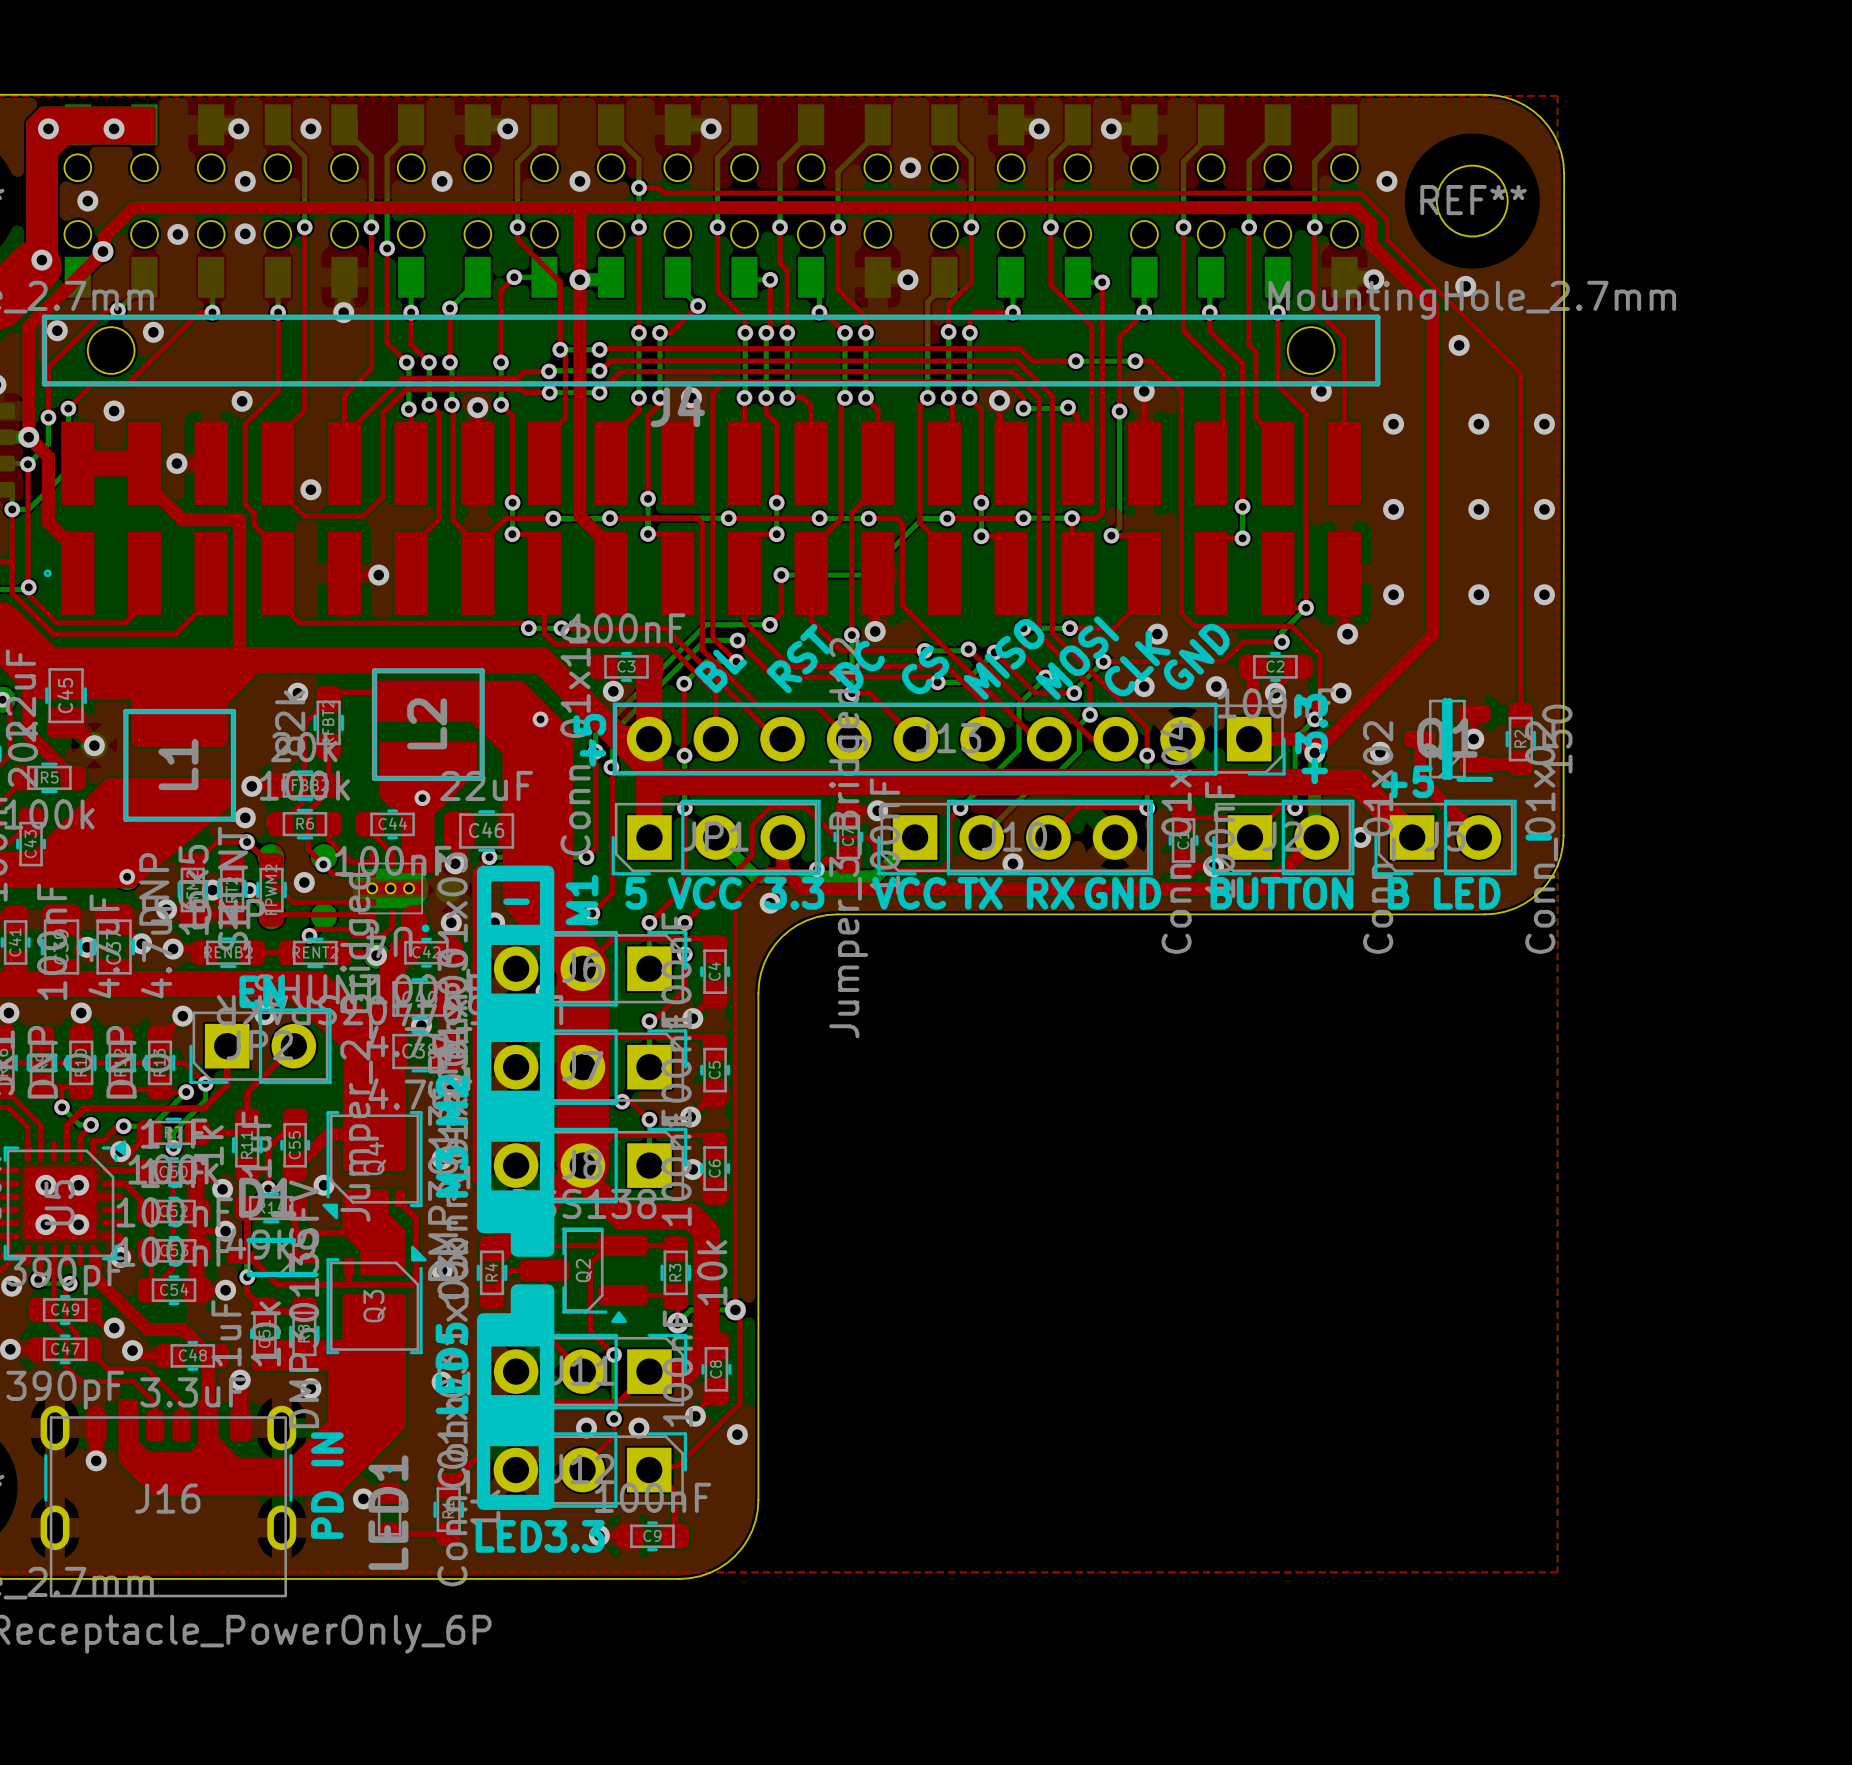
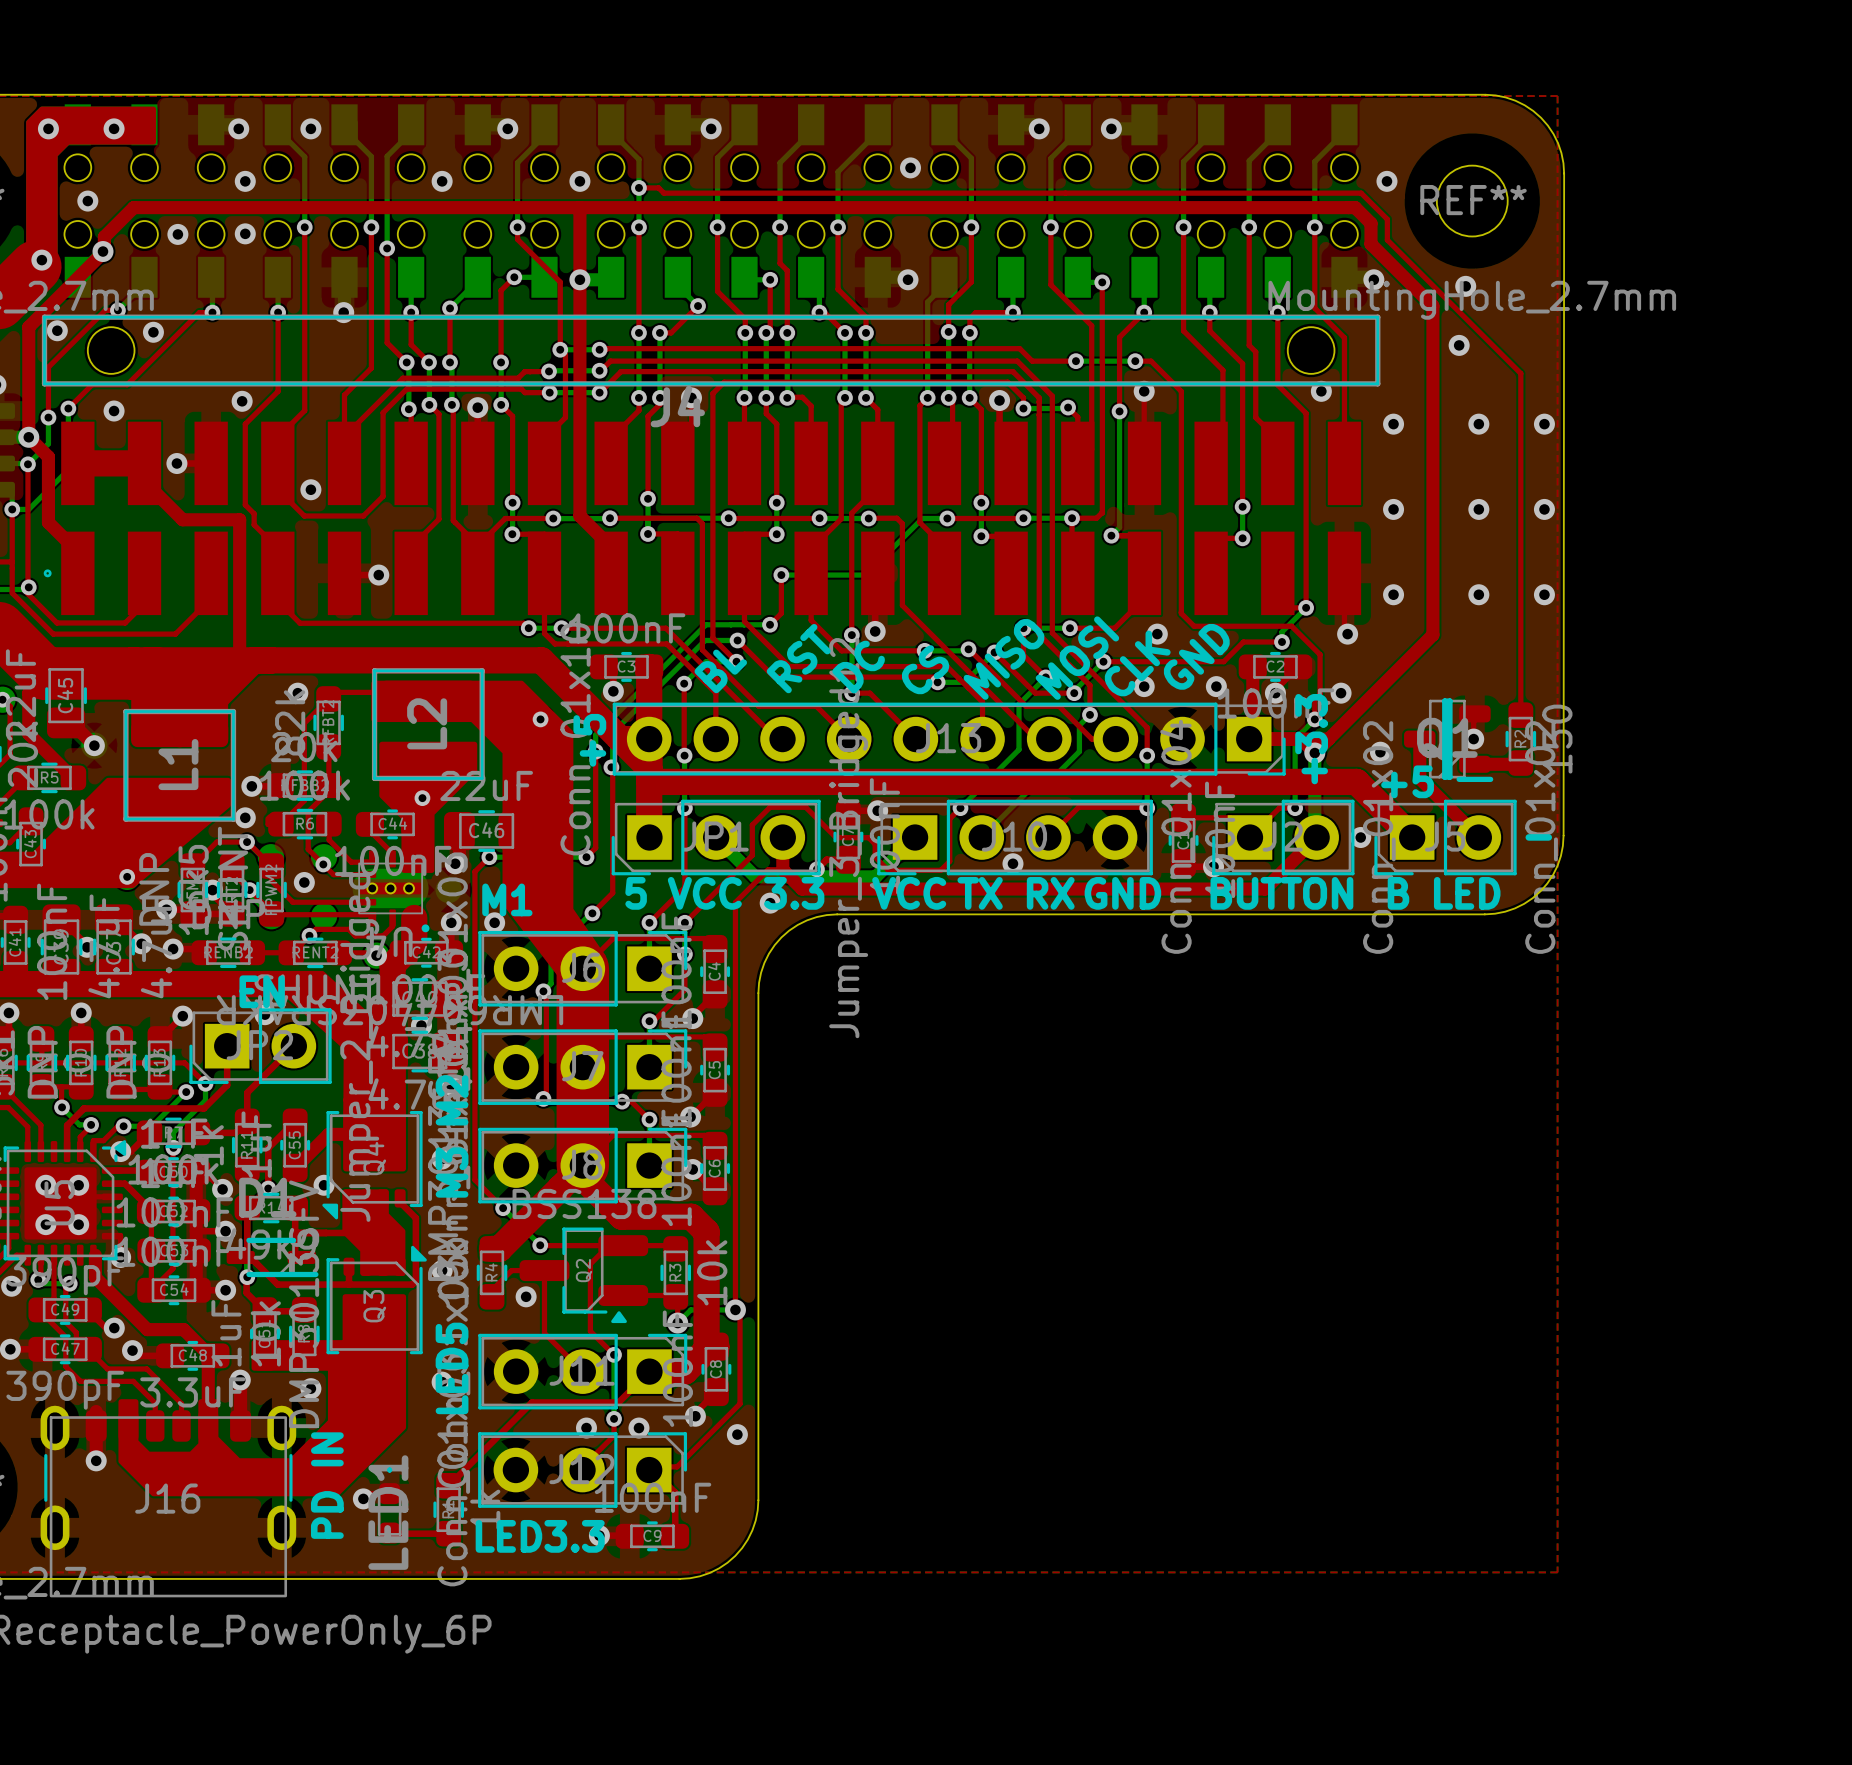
drawing: [476, 865, 555, 1510] -> none
text: M1 (581, 900) -> none
text: - (516, 901) -> M1 (507, 899)

